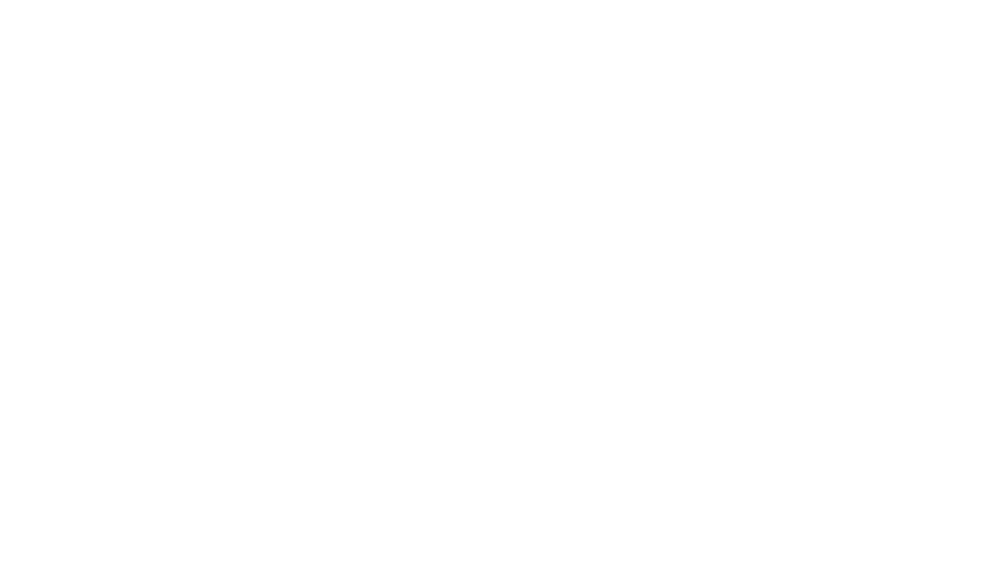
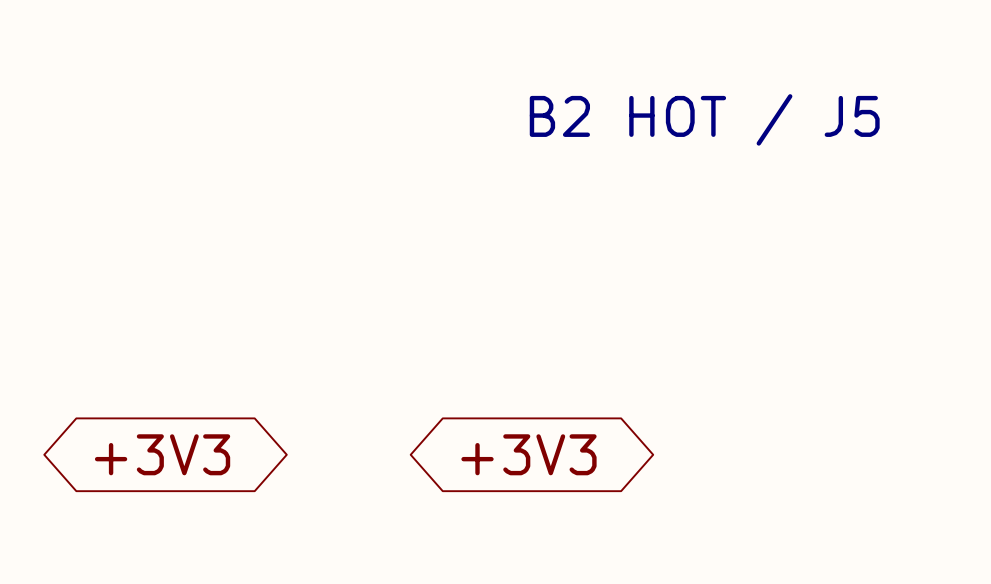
text: none -> B2 HOT / J5 (704, 119)
global label: none -> +3V3 (162, 454)
global label: none -> +3V3 (528, 454)

